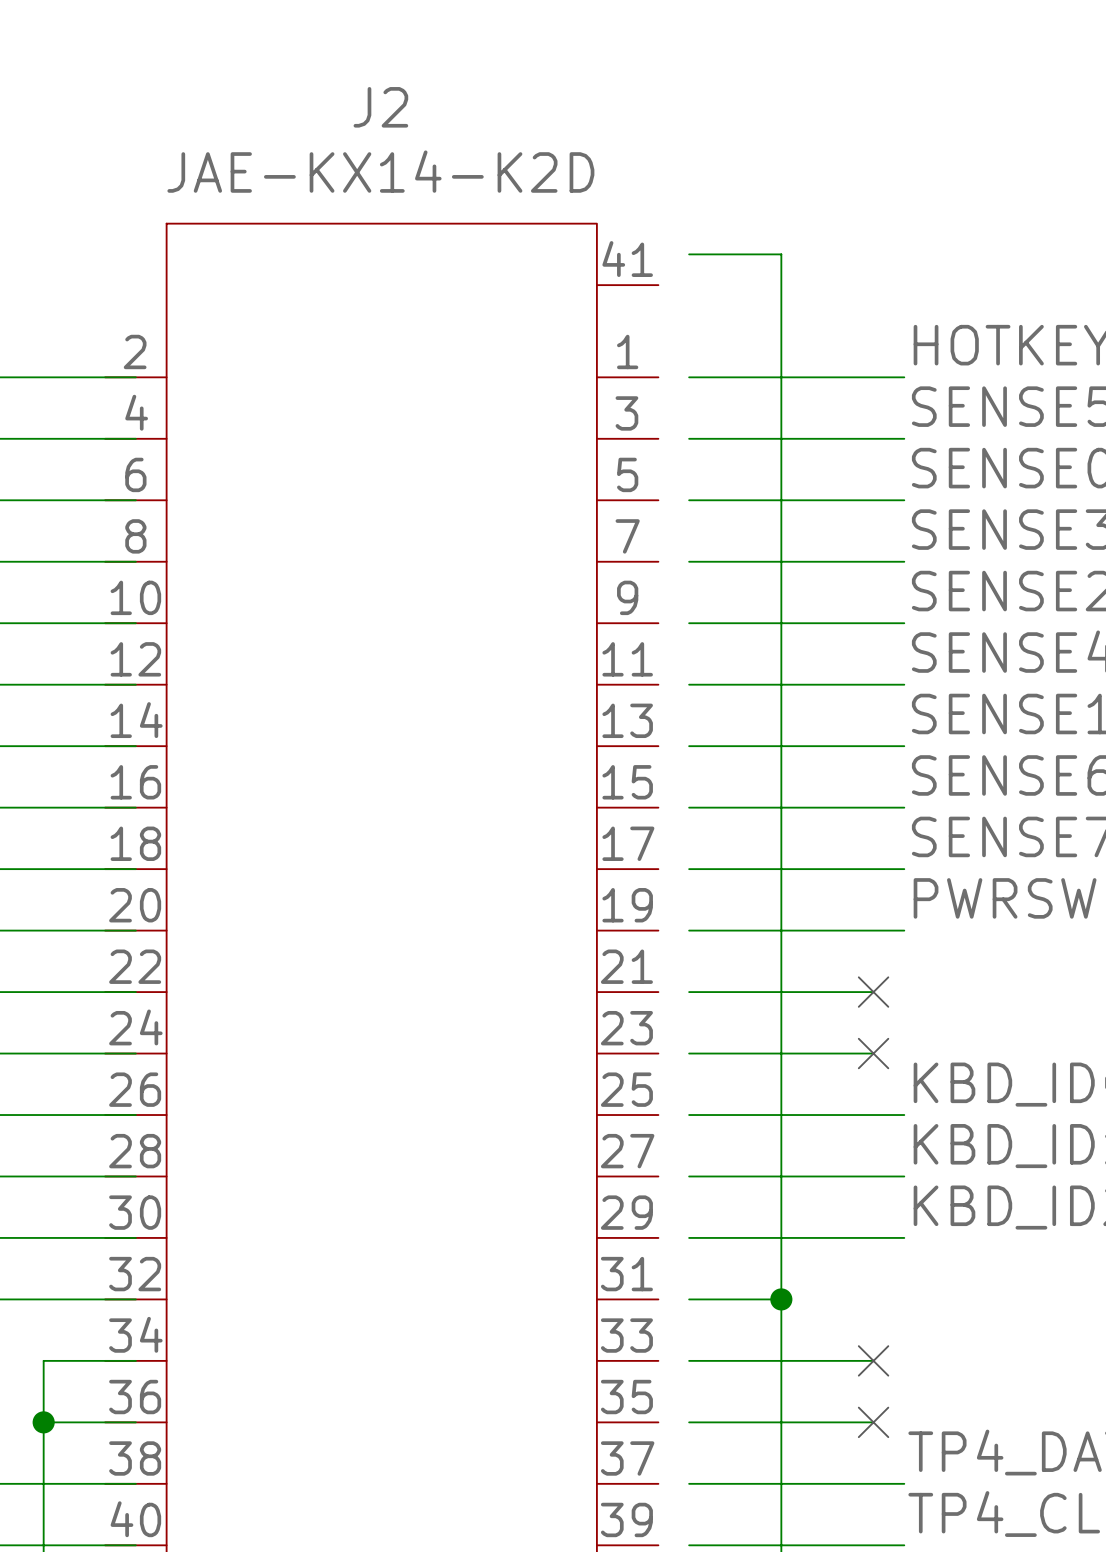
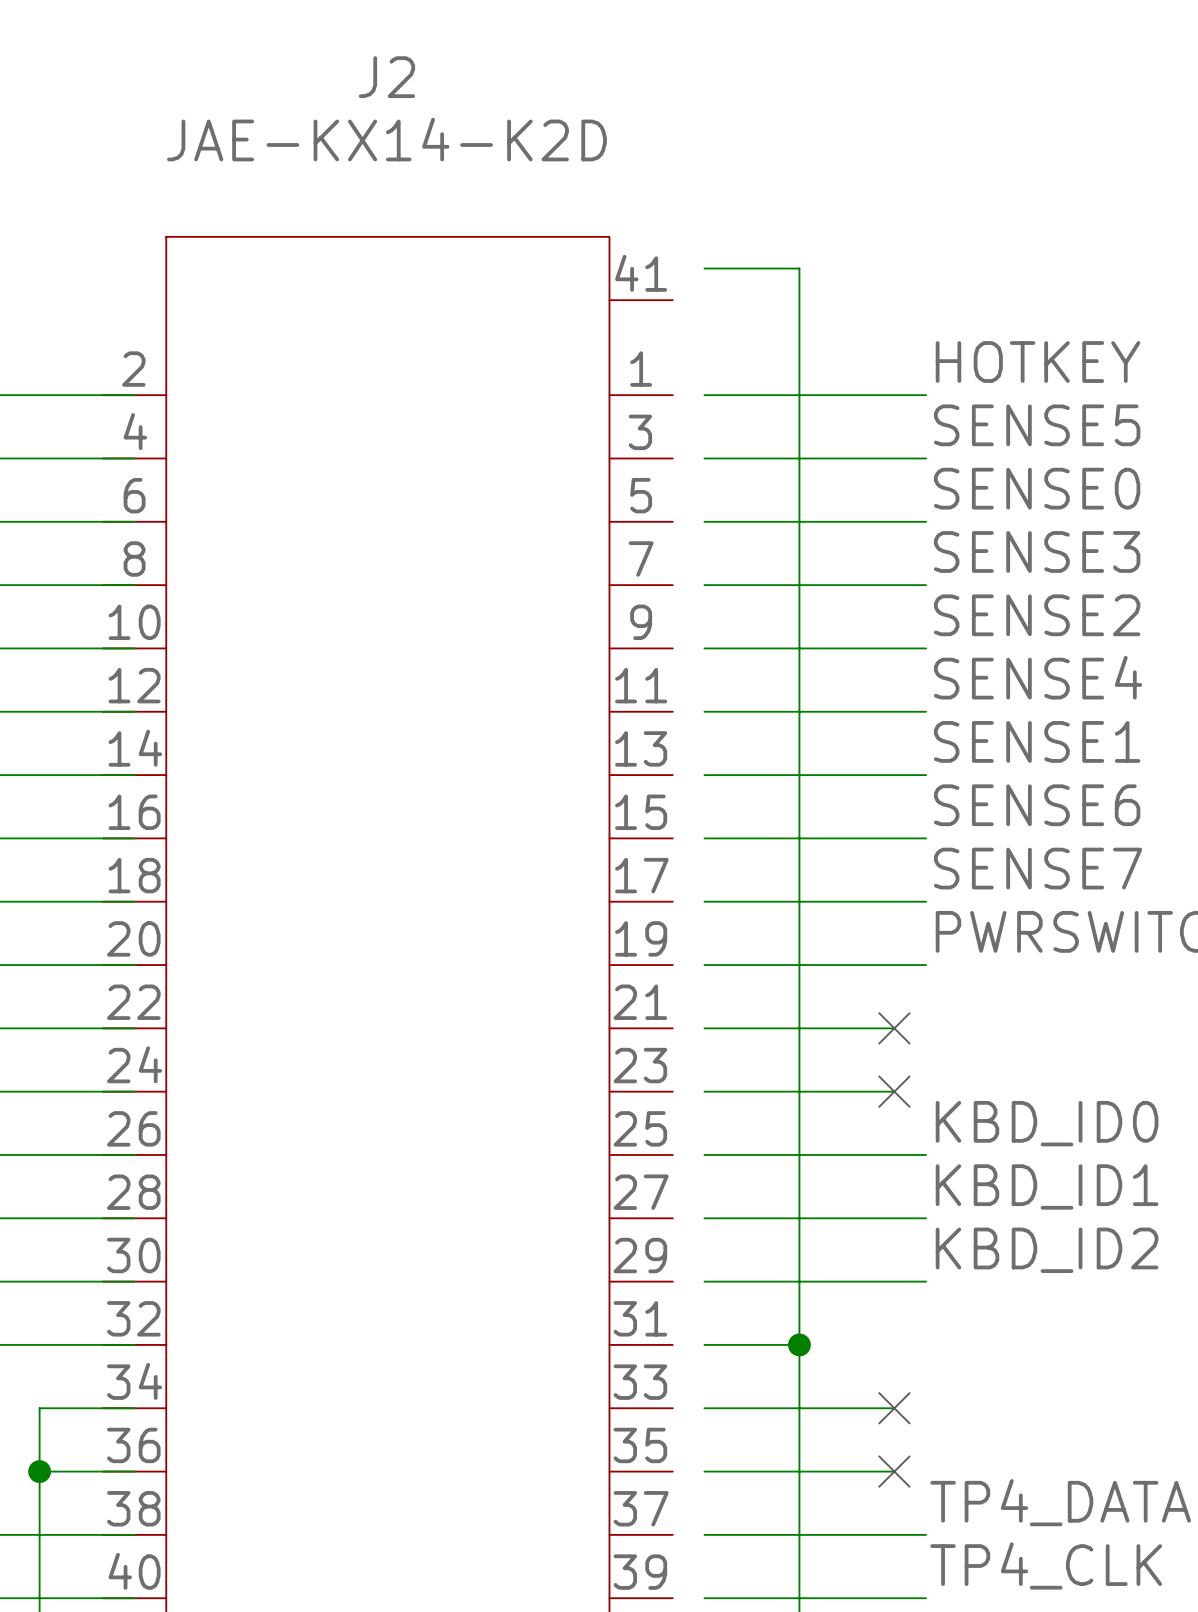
J2 name position: J2 (380, 107) -> J2 (386, 77)
J2 value position: JAE-KX14-K2D (380, 171) -> JAE-KX14-K2D (386, 139)

